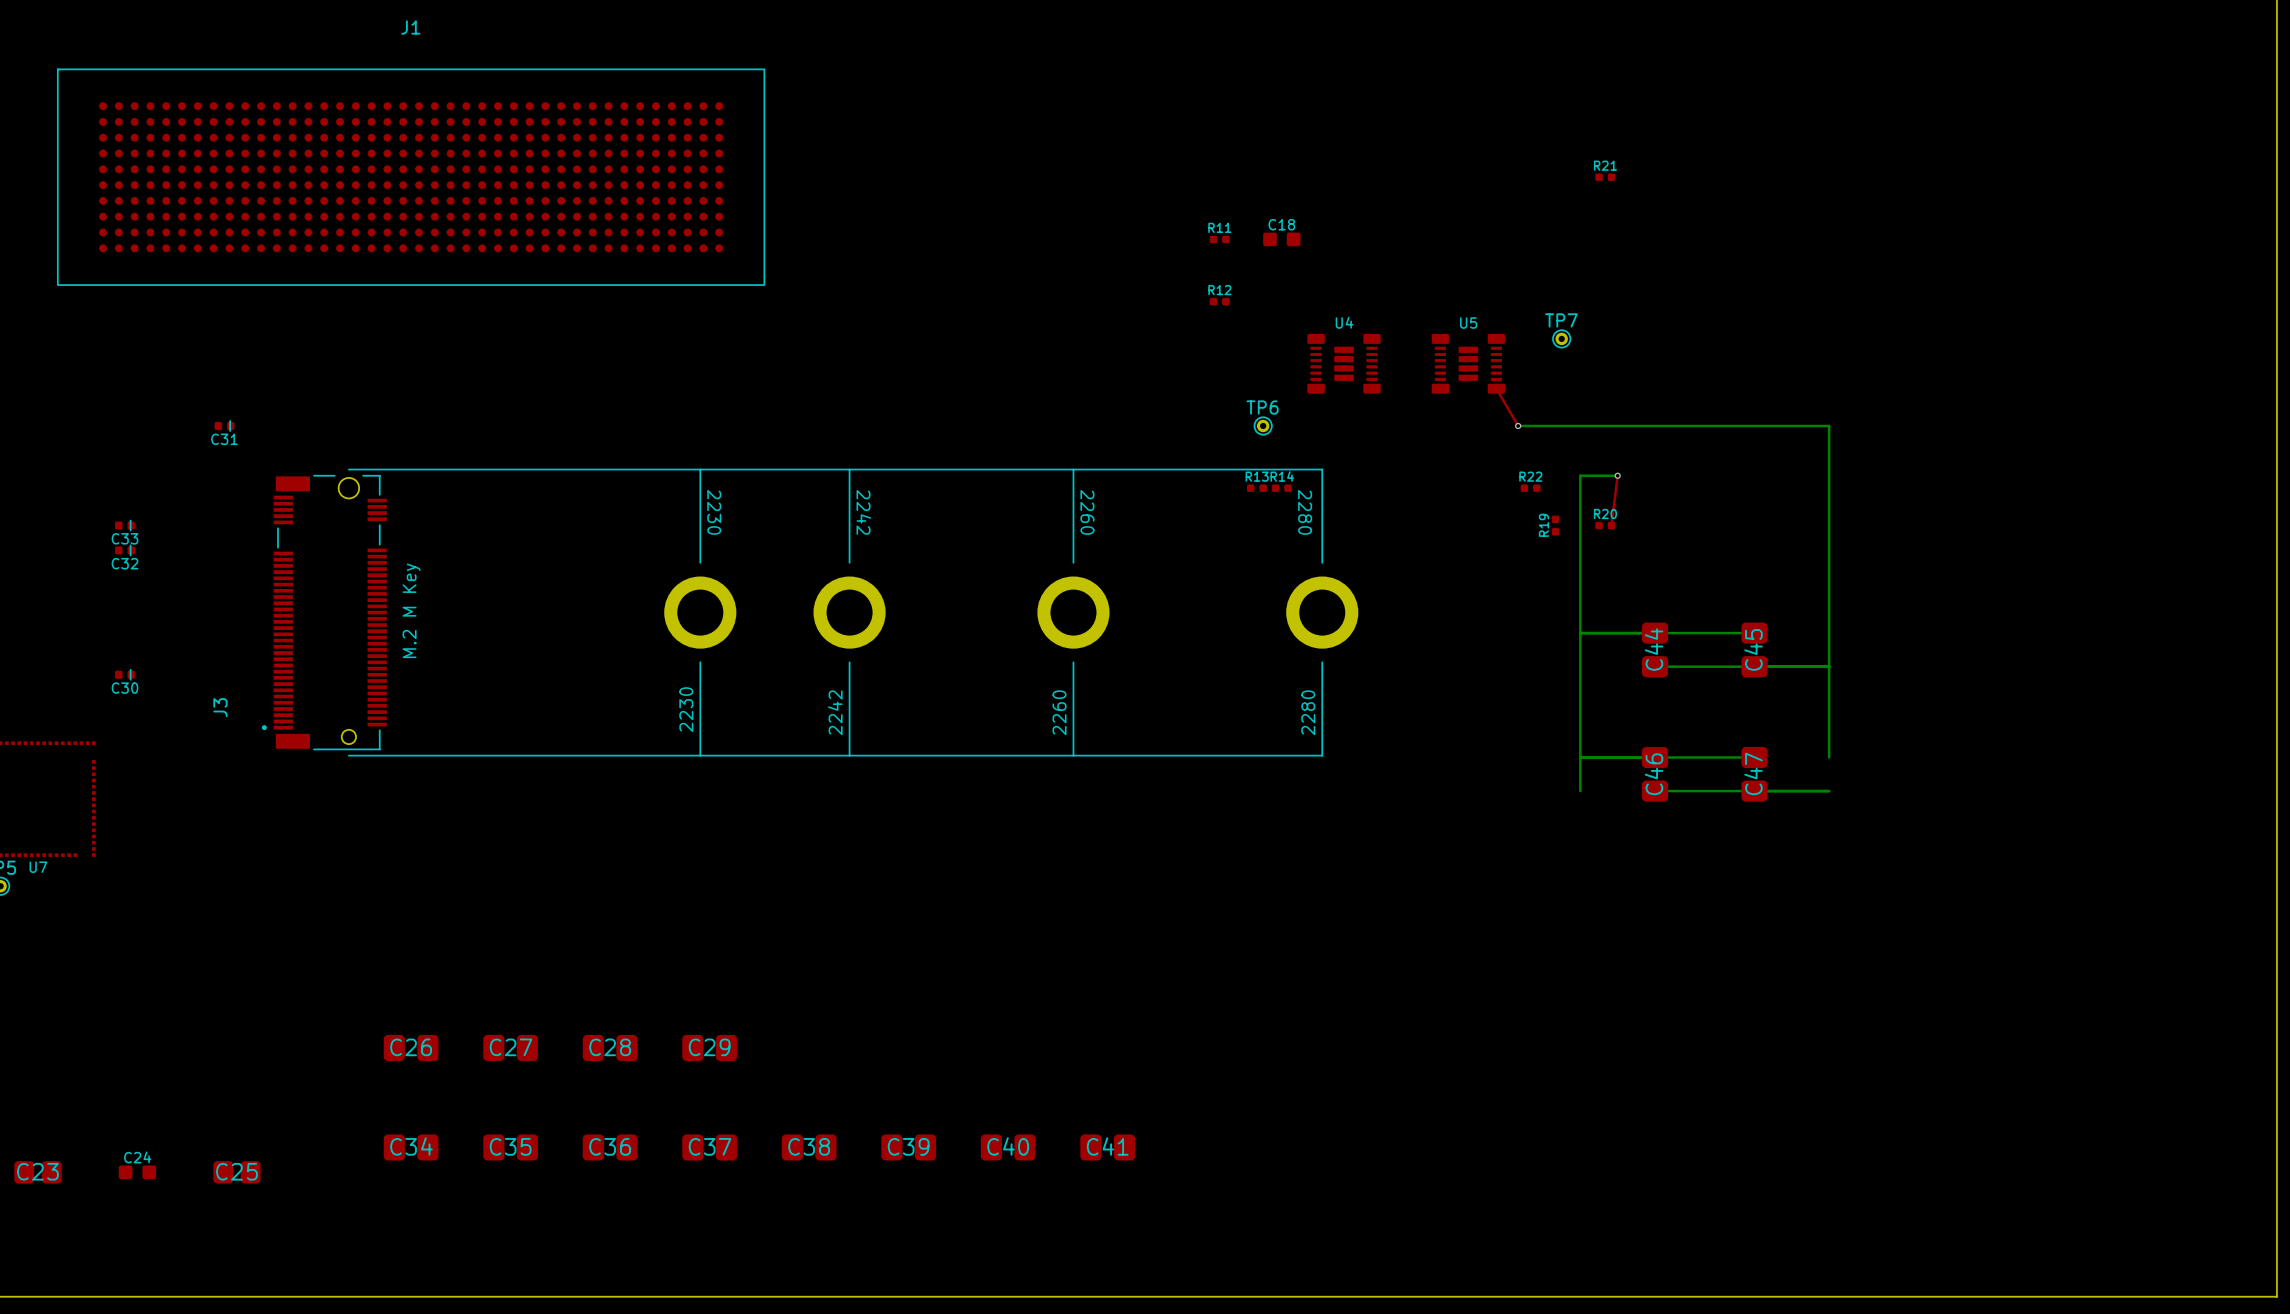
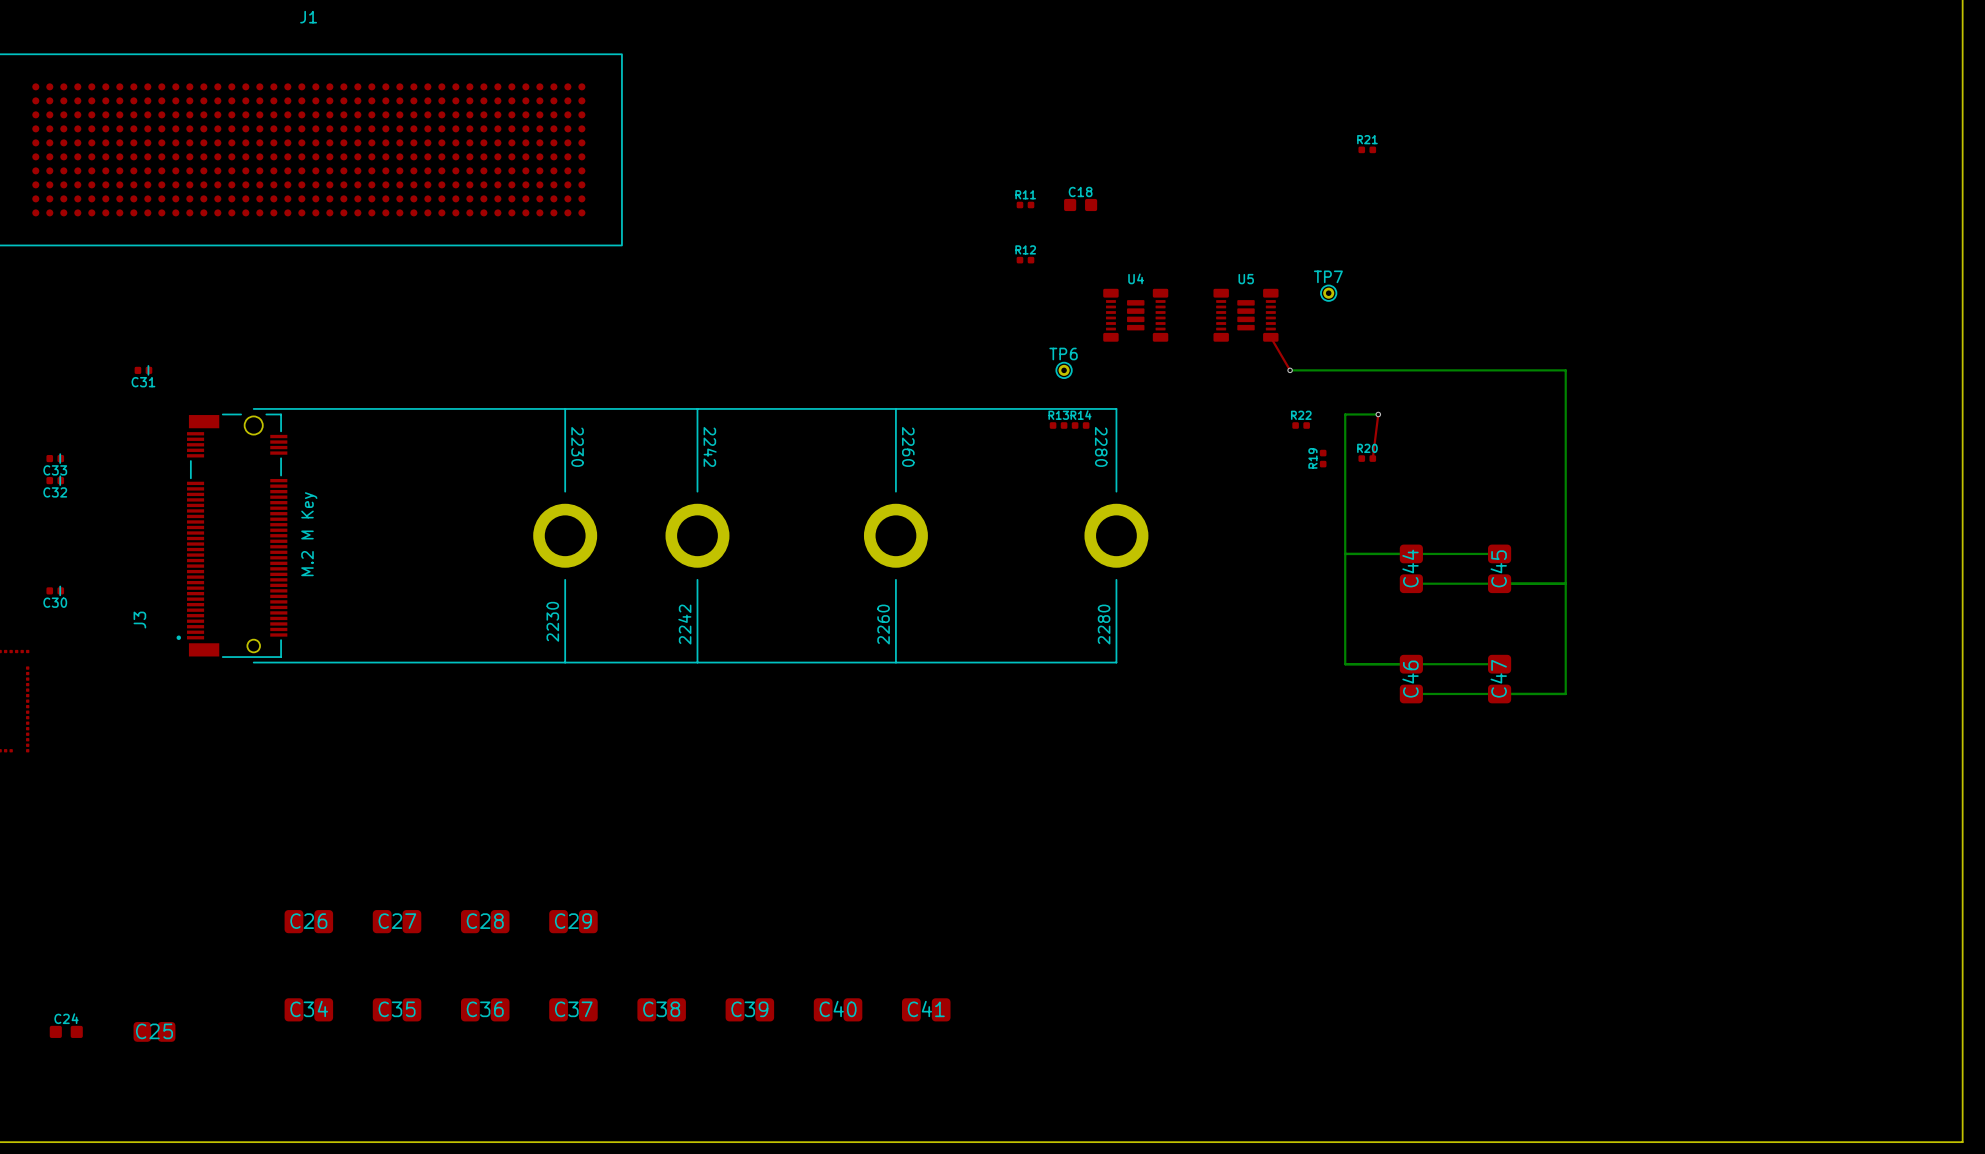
bottom track: (1580, 757) (1580, 791) -> (1565, 664) (1565, 693)

